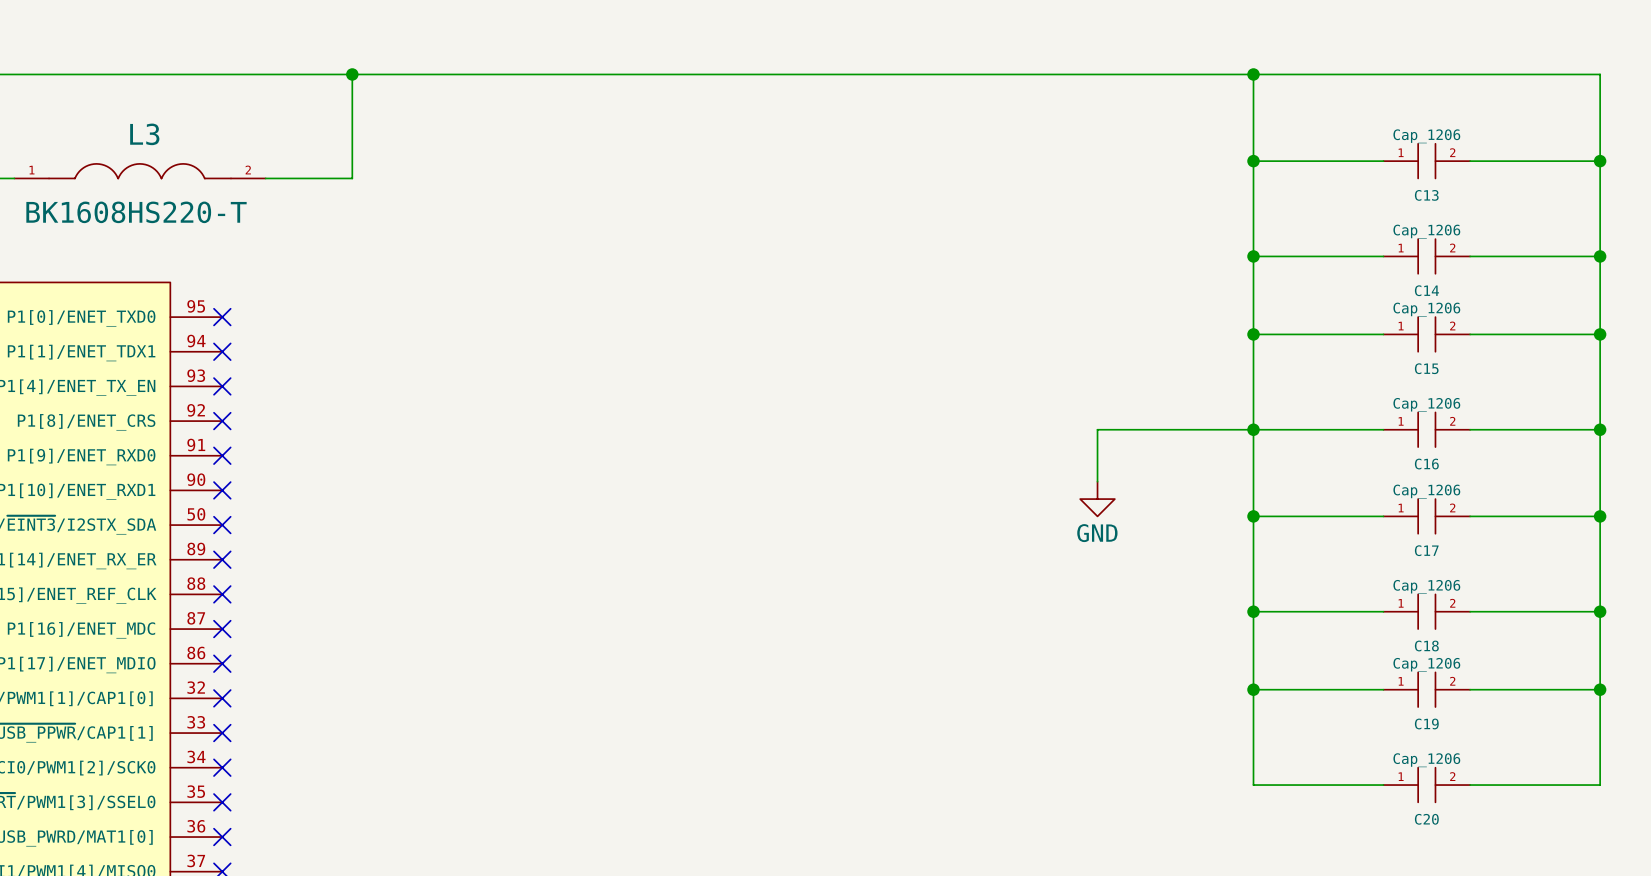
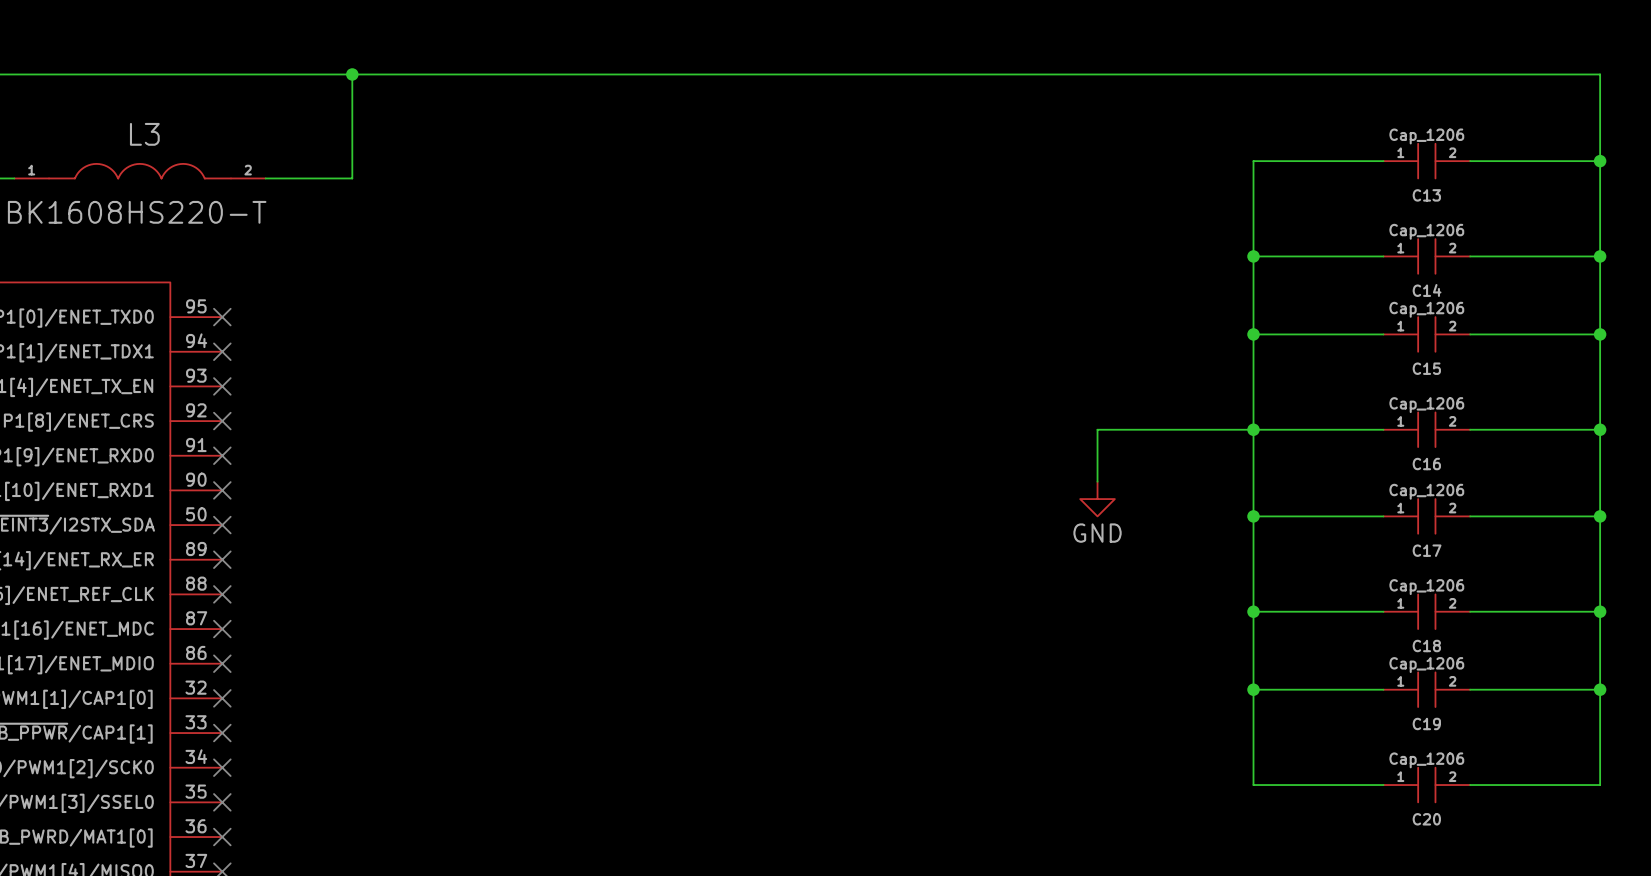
wire: (1253, 74) (1253, 161) -> none
junction: (1253, 74) -> none
junction: (1253, 161) -> none

